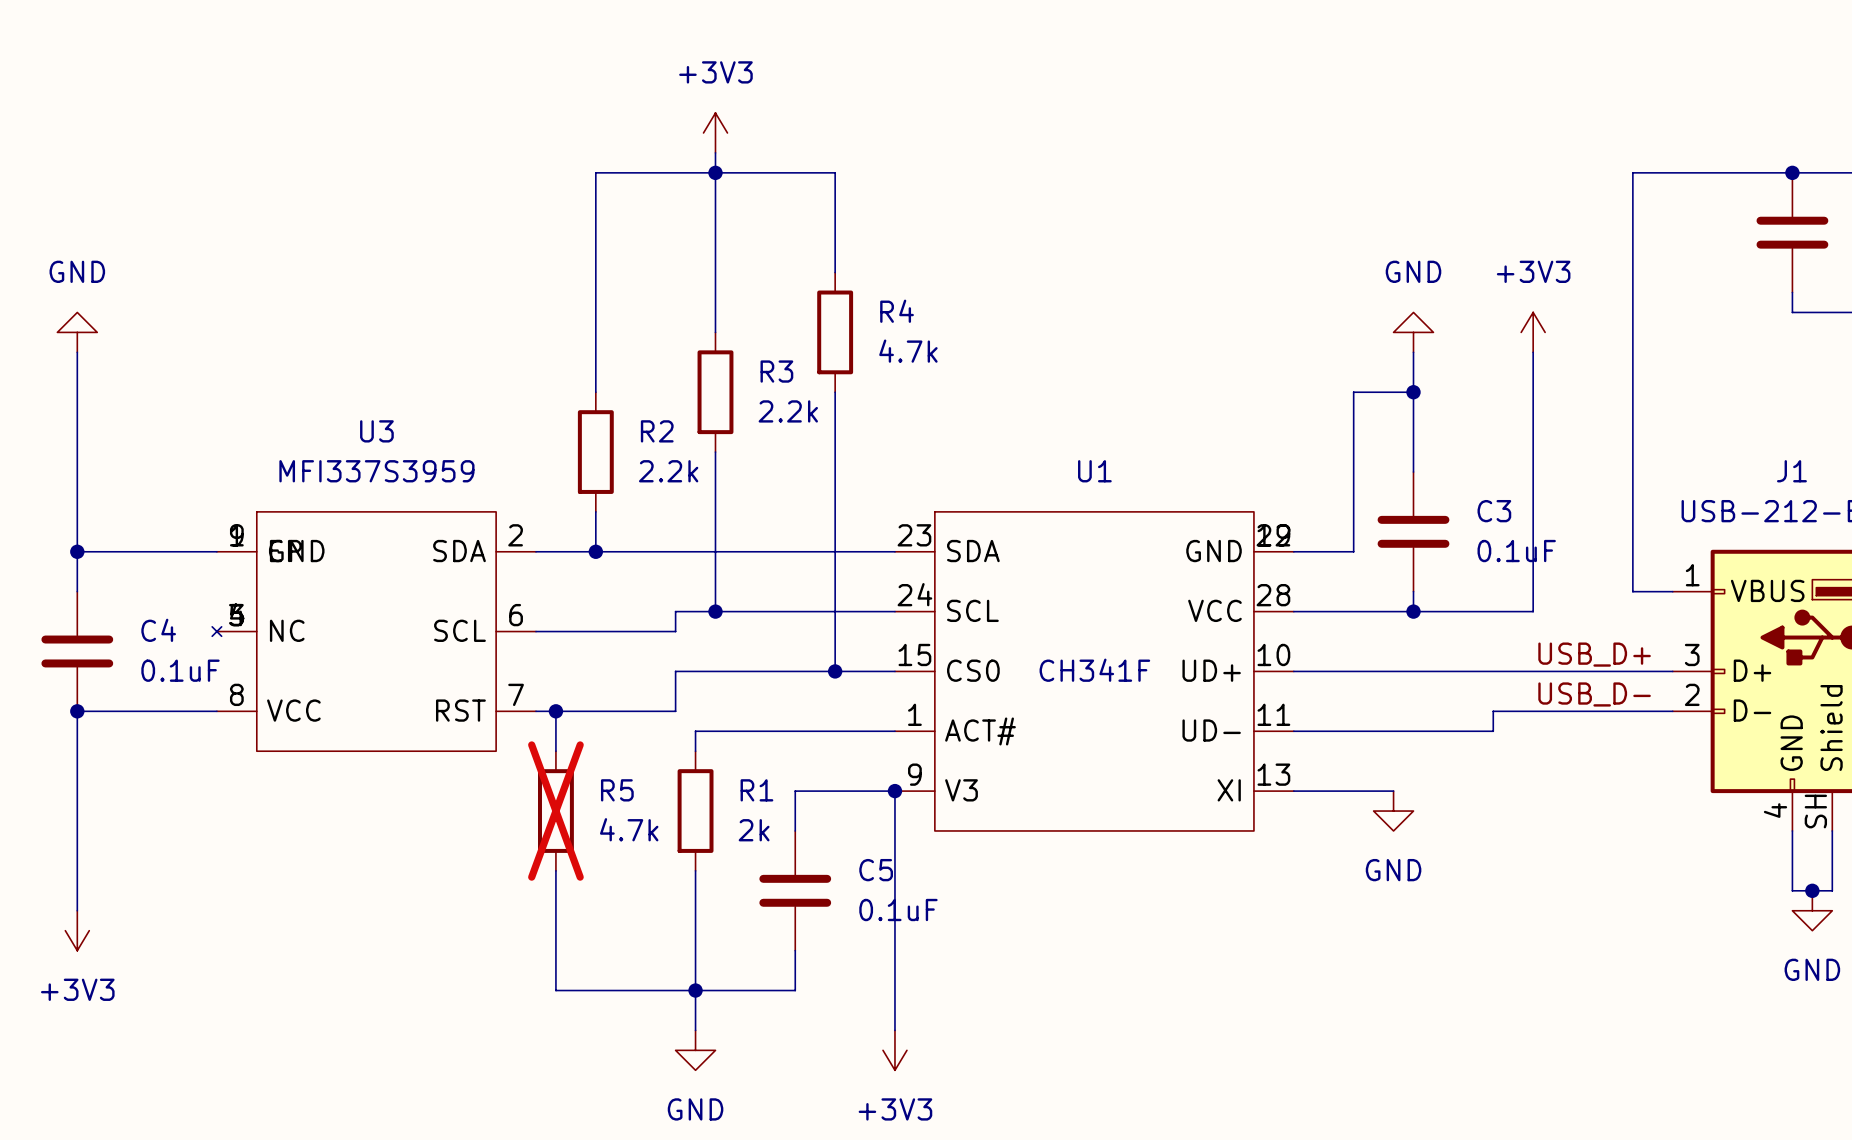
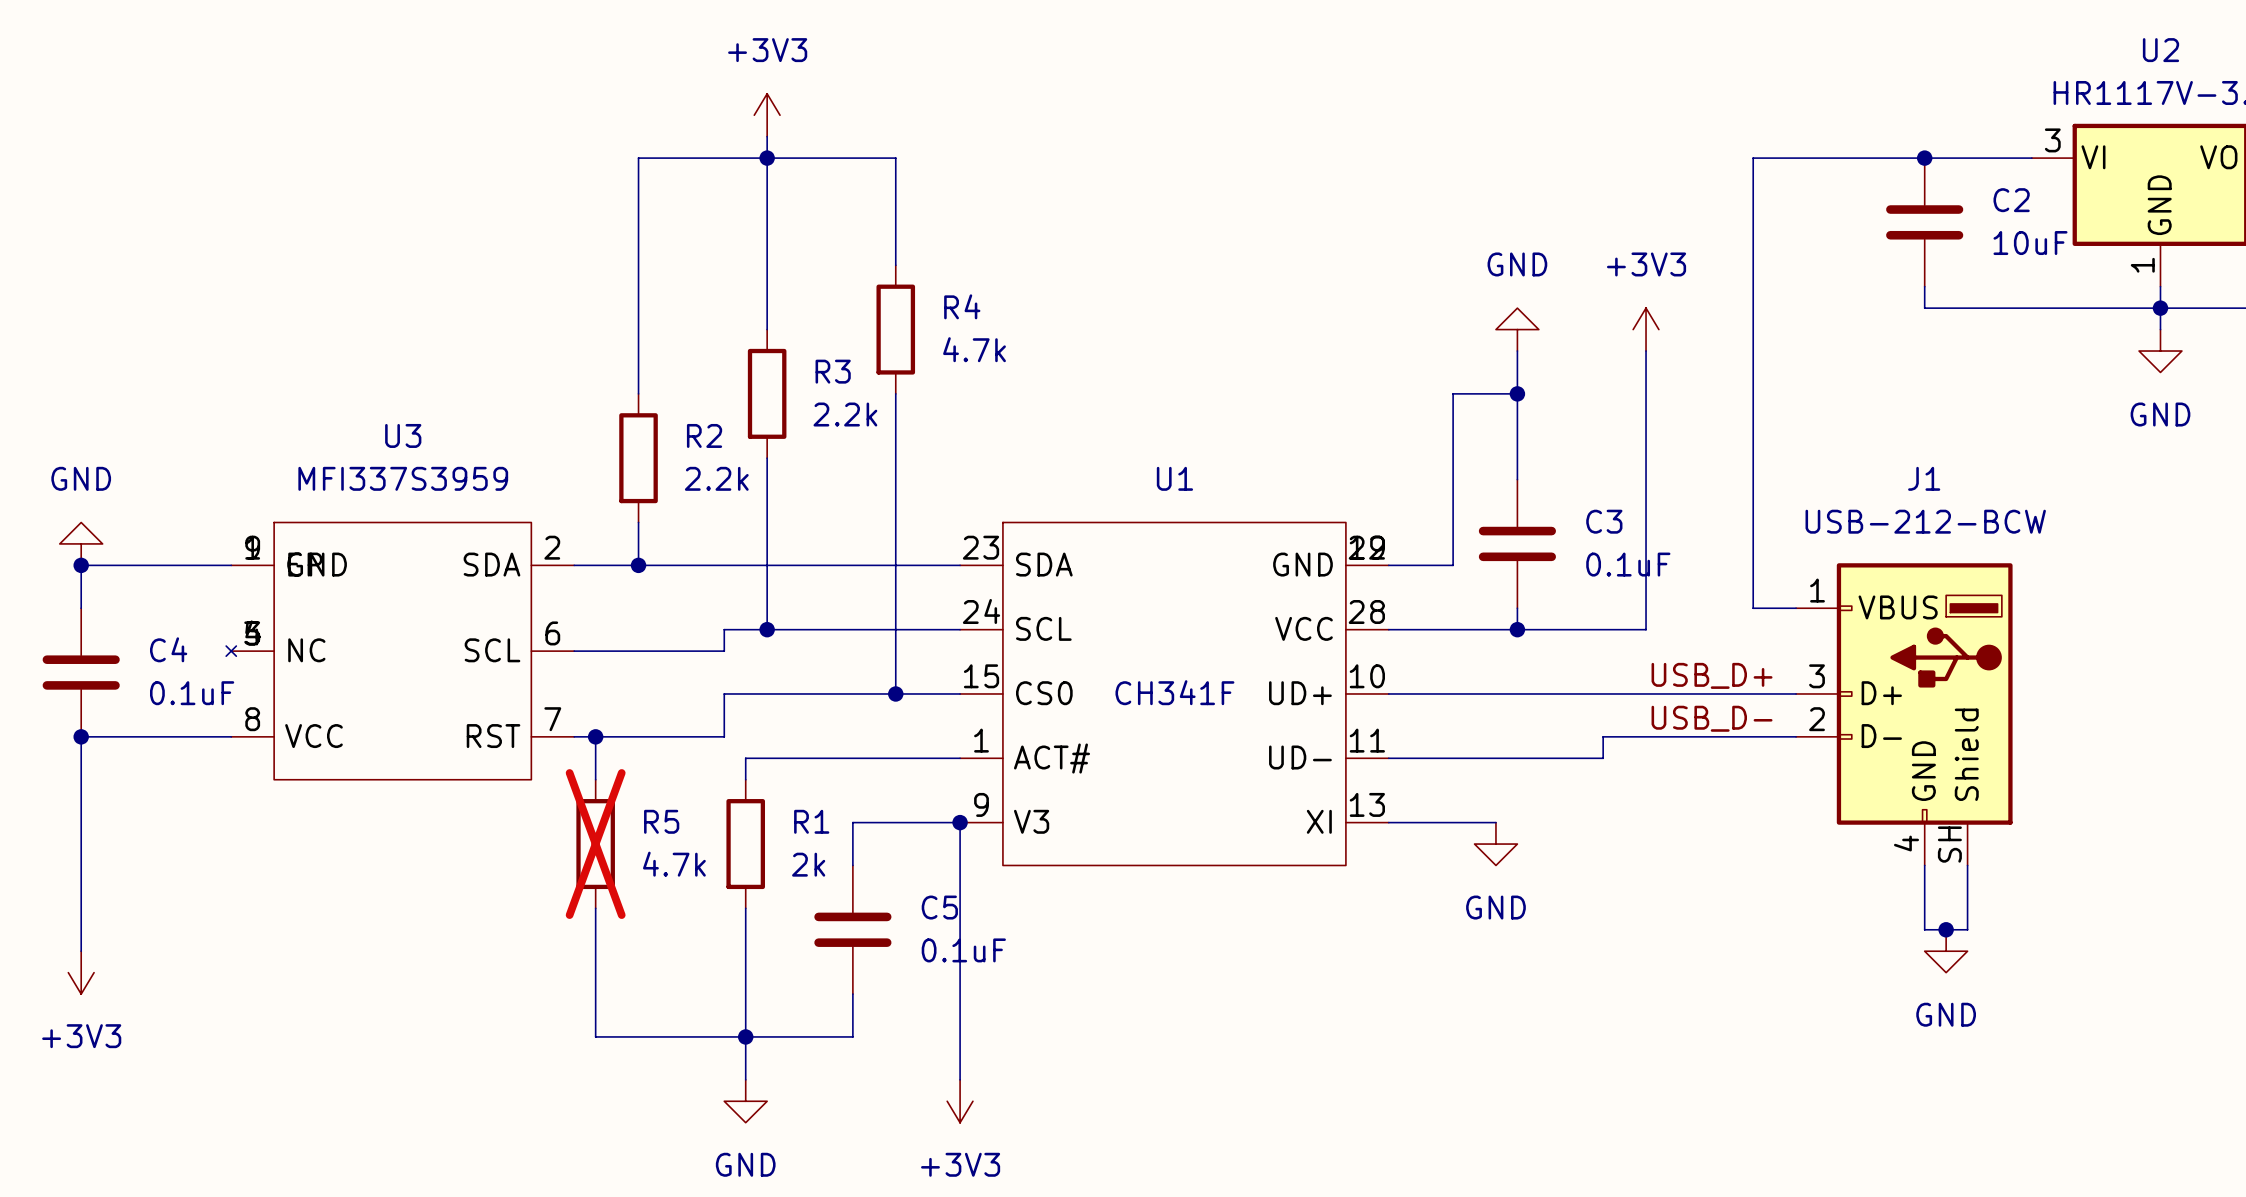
power symbol position: GND (77, 332) -> GND (81, 543)
wire: (77, 352) (77, 551) -> none

